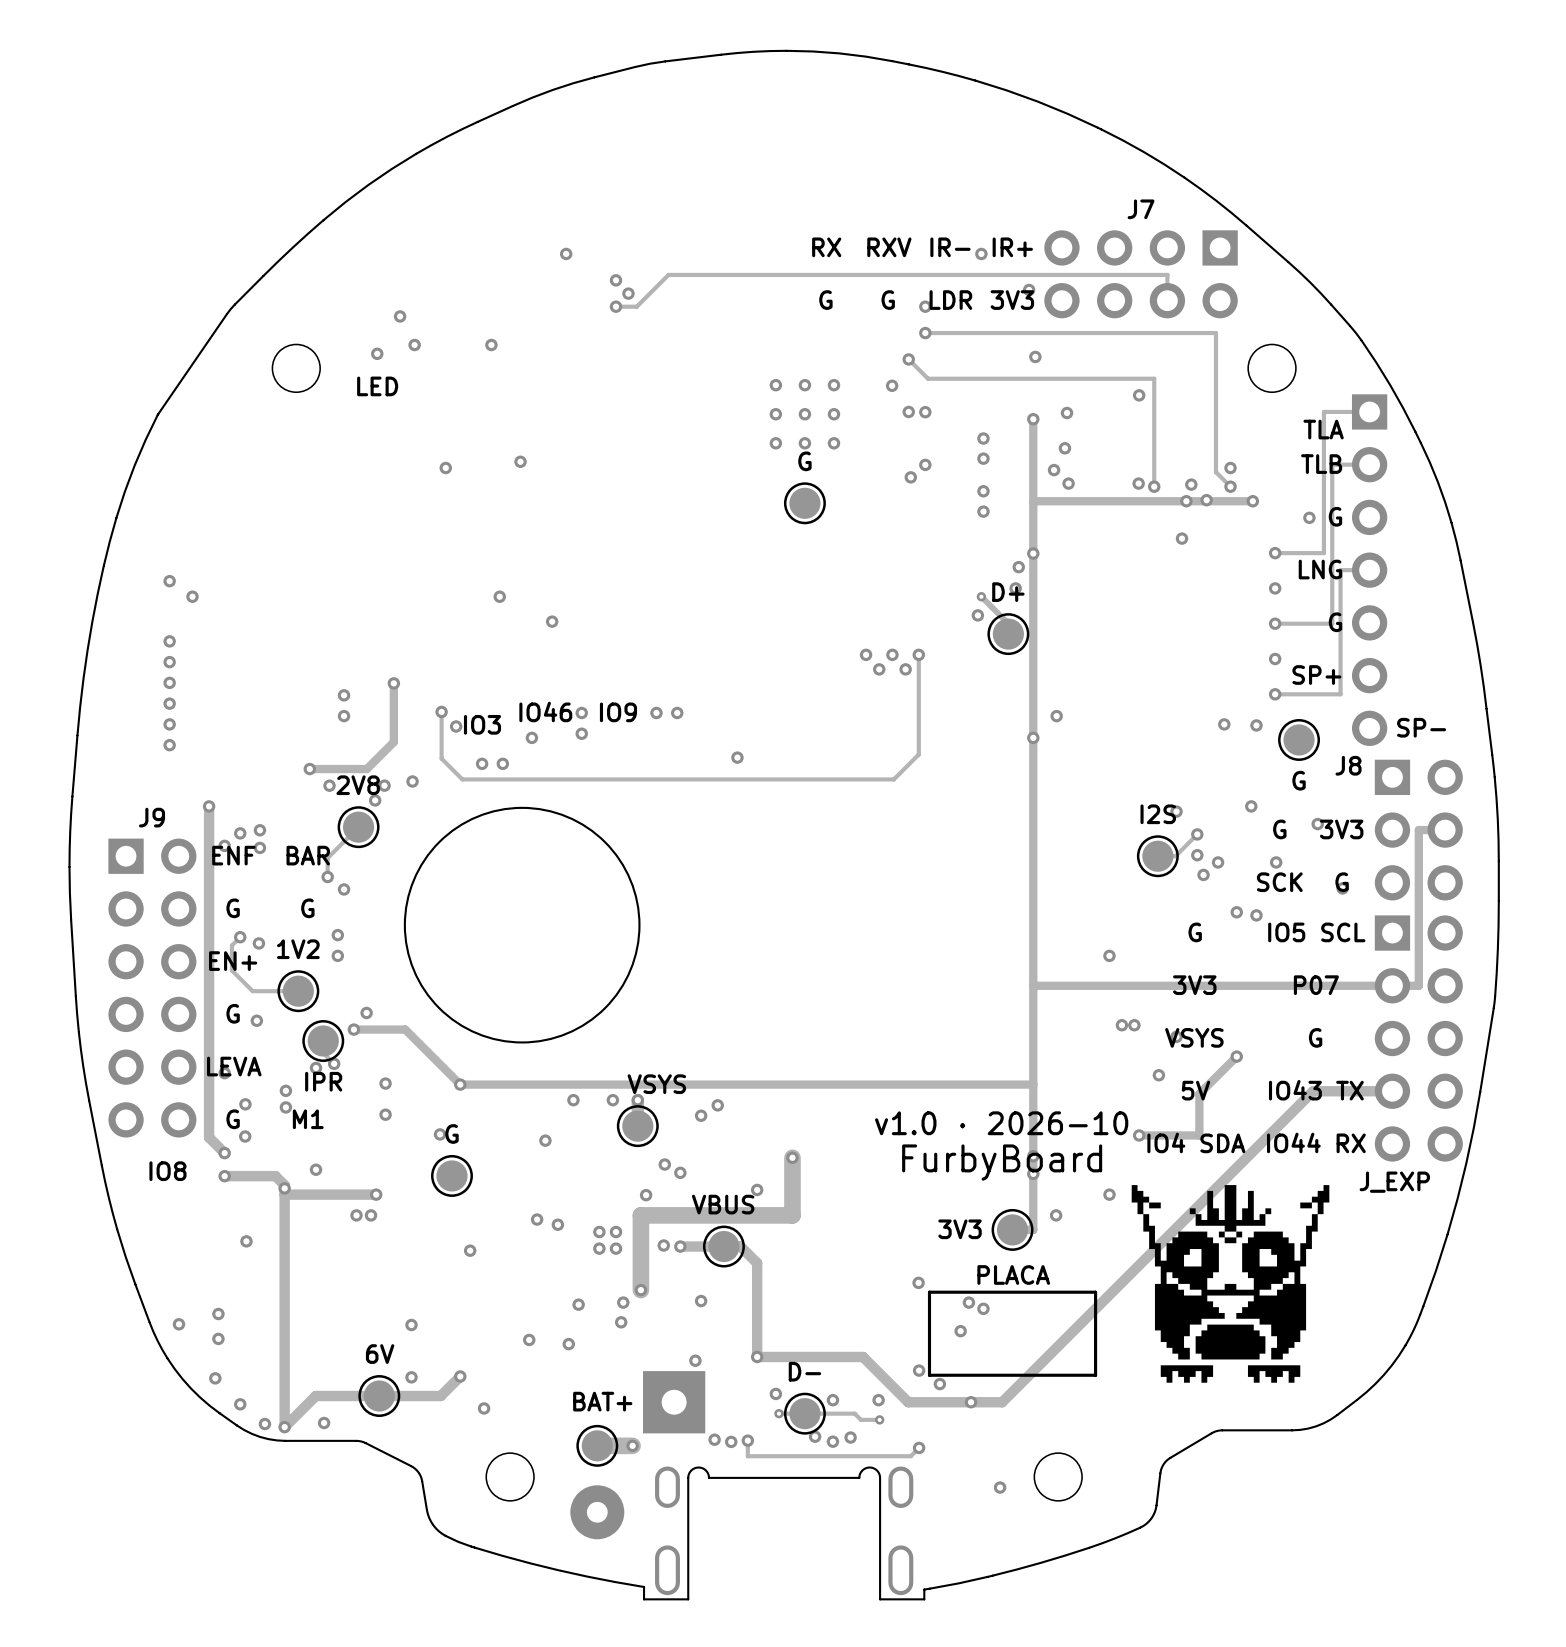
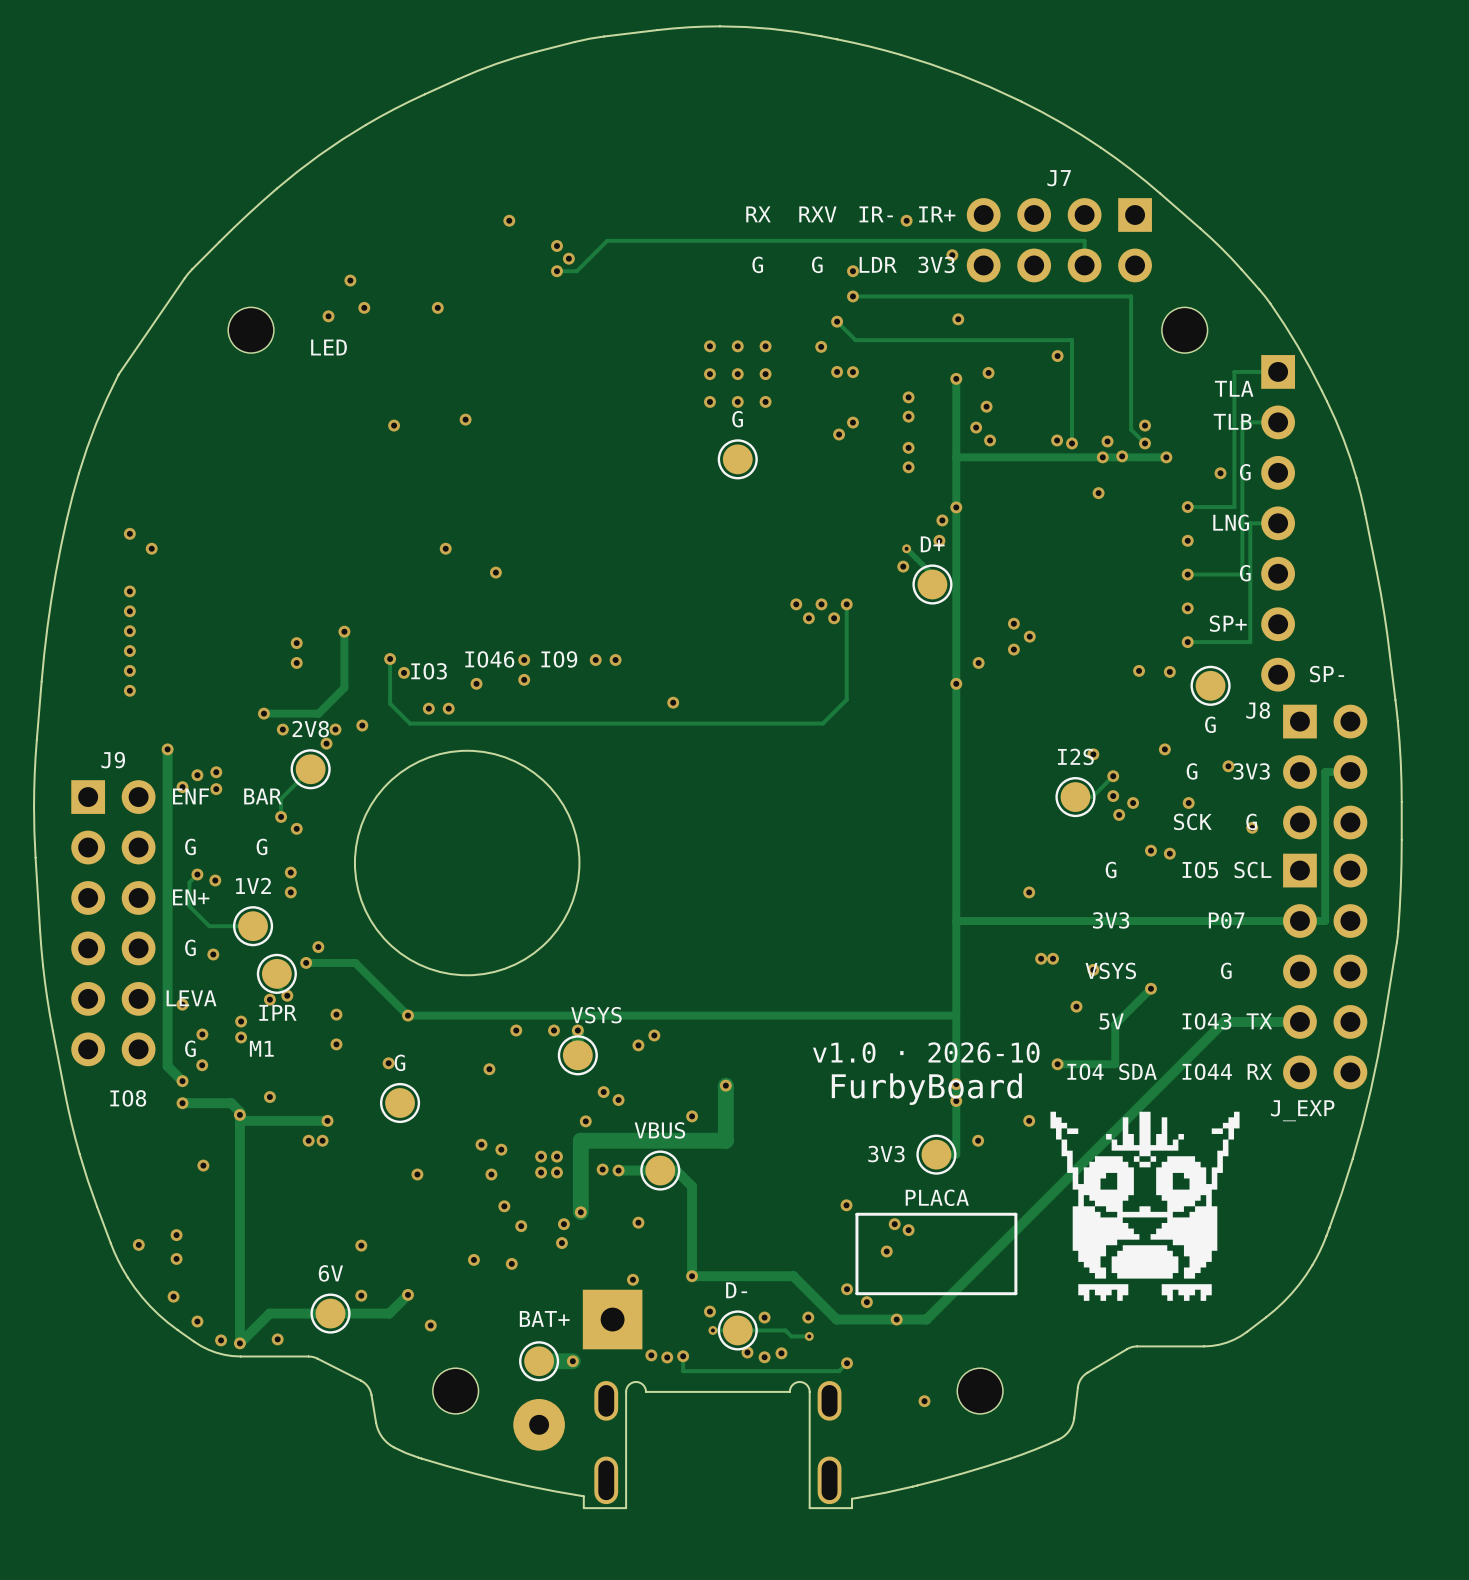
via: none -> (1013, 623)
via: none -> (1029, 636)
via: none -> (1013, 649)
via: none -> (491, 1174)
via: none -> (504, 1206)

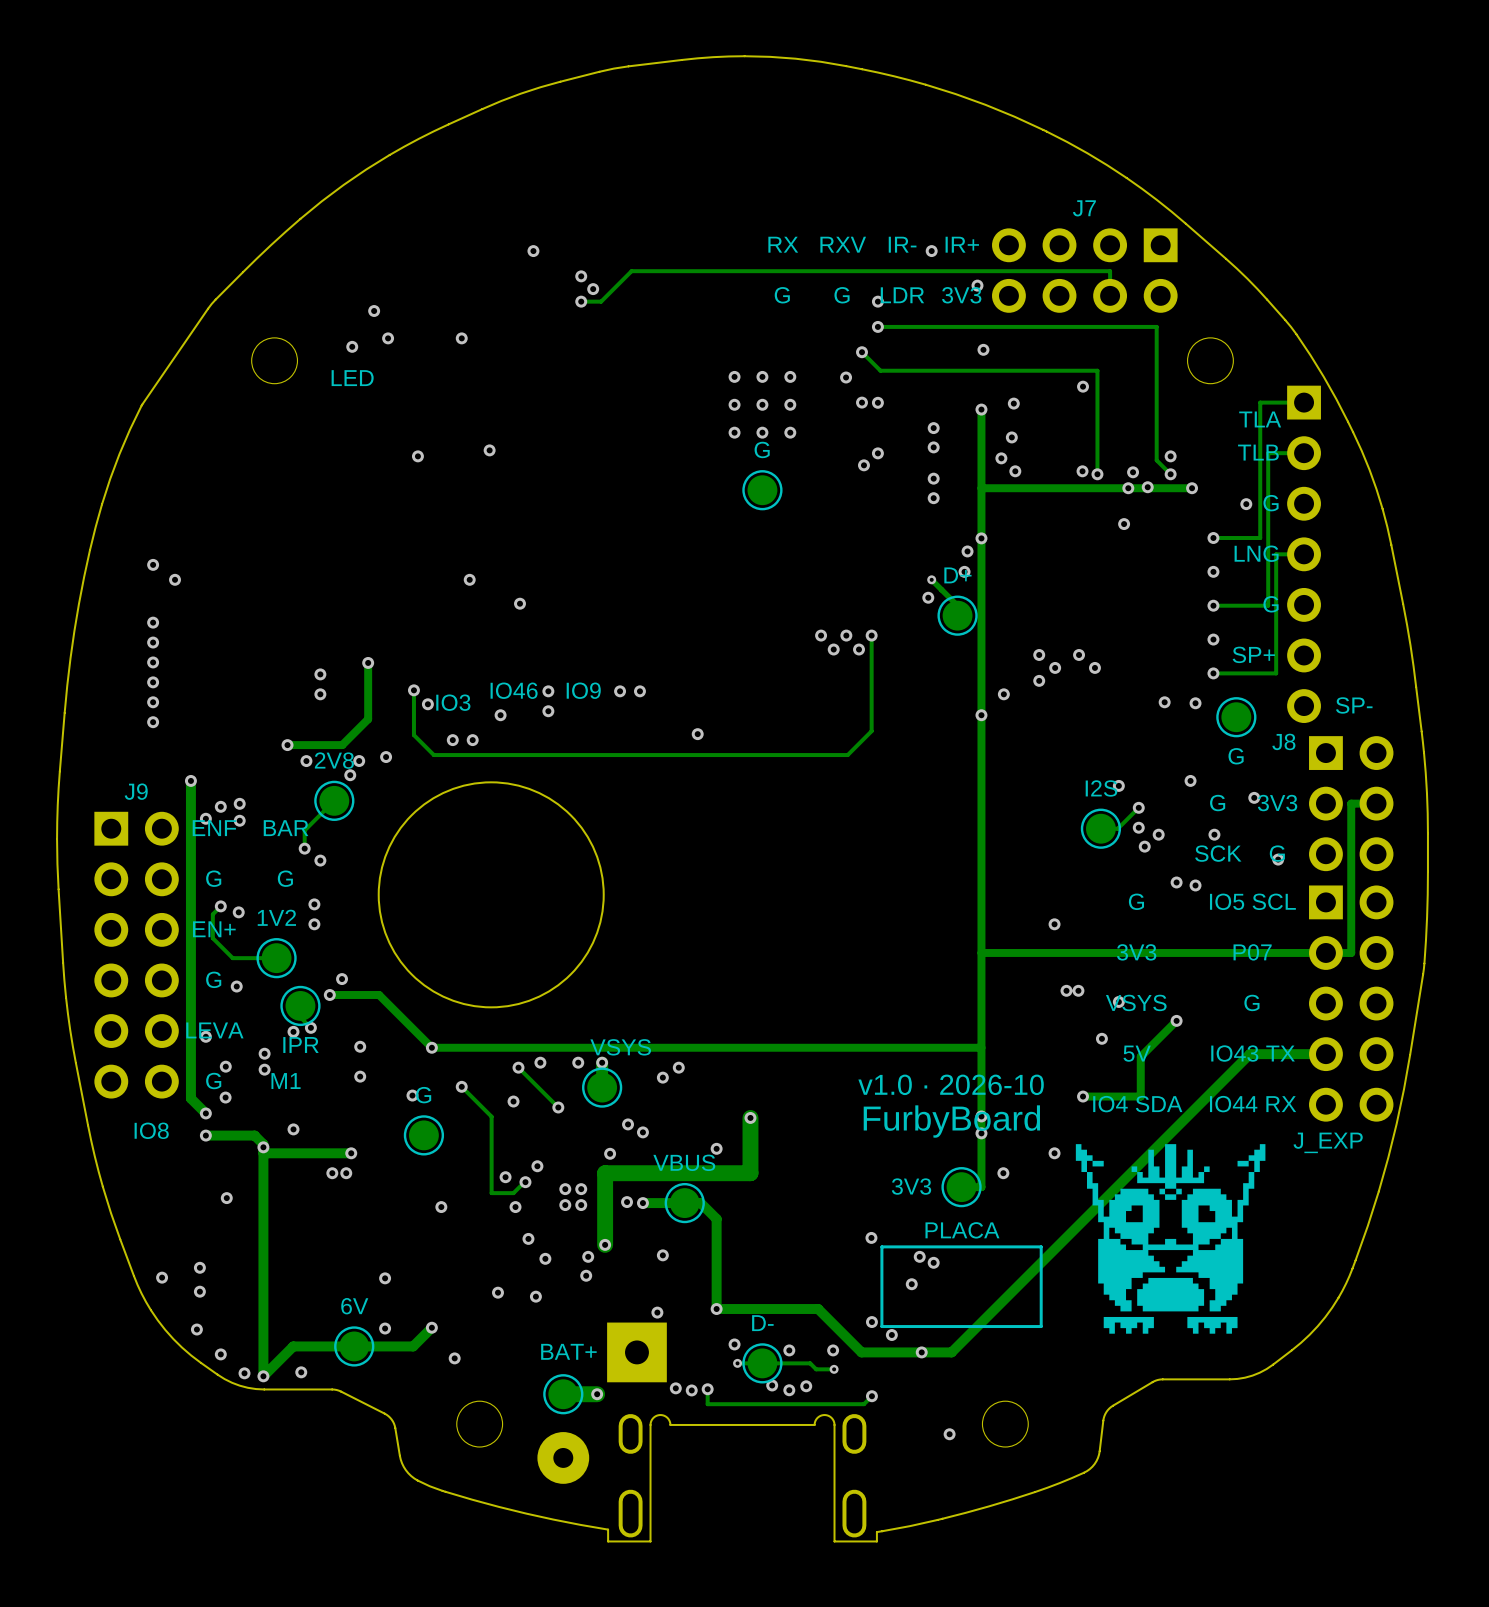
via: none -> (1079, 654)
via: none -> (1094, 667)
track: none -> (518, 1067) (558, 1107)
via: none -> (518, 1067)
track: none -> (461, 1086) (491, 1116) (491, 1193) (513, 1193) (525, 1181)
via: none -> (461, 1086)
via: none -> (558, 1107)
via: none -> (537, 1166)

